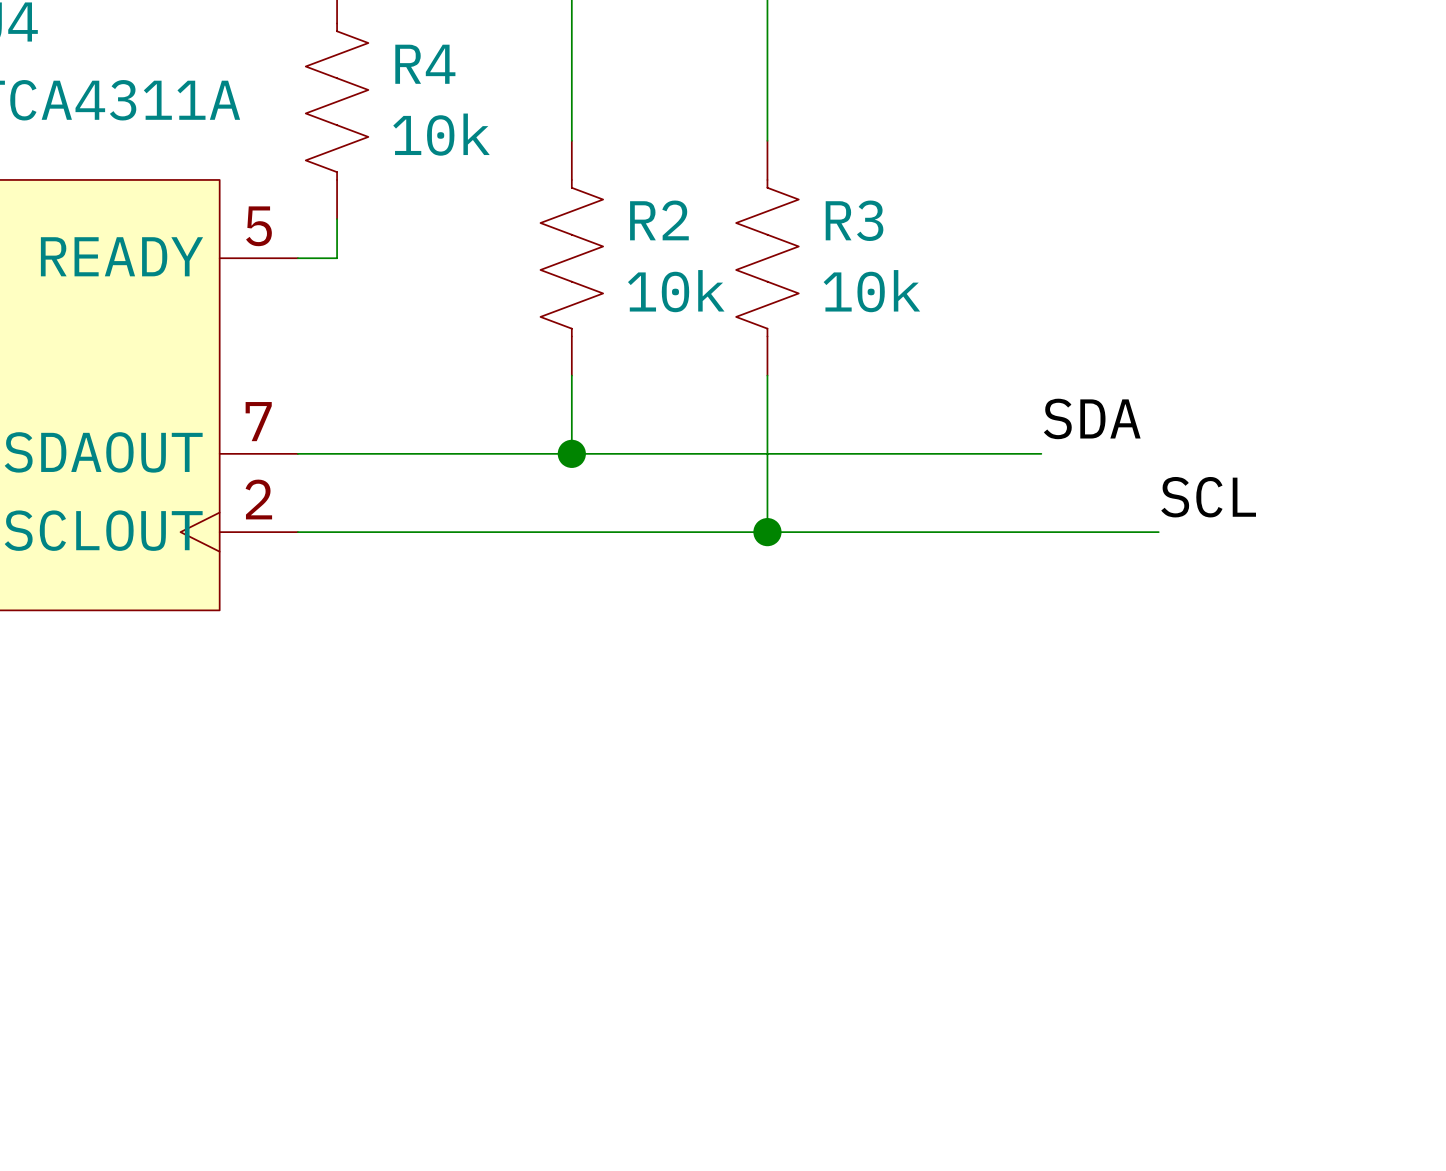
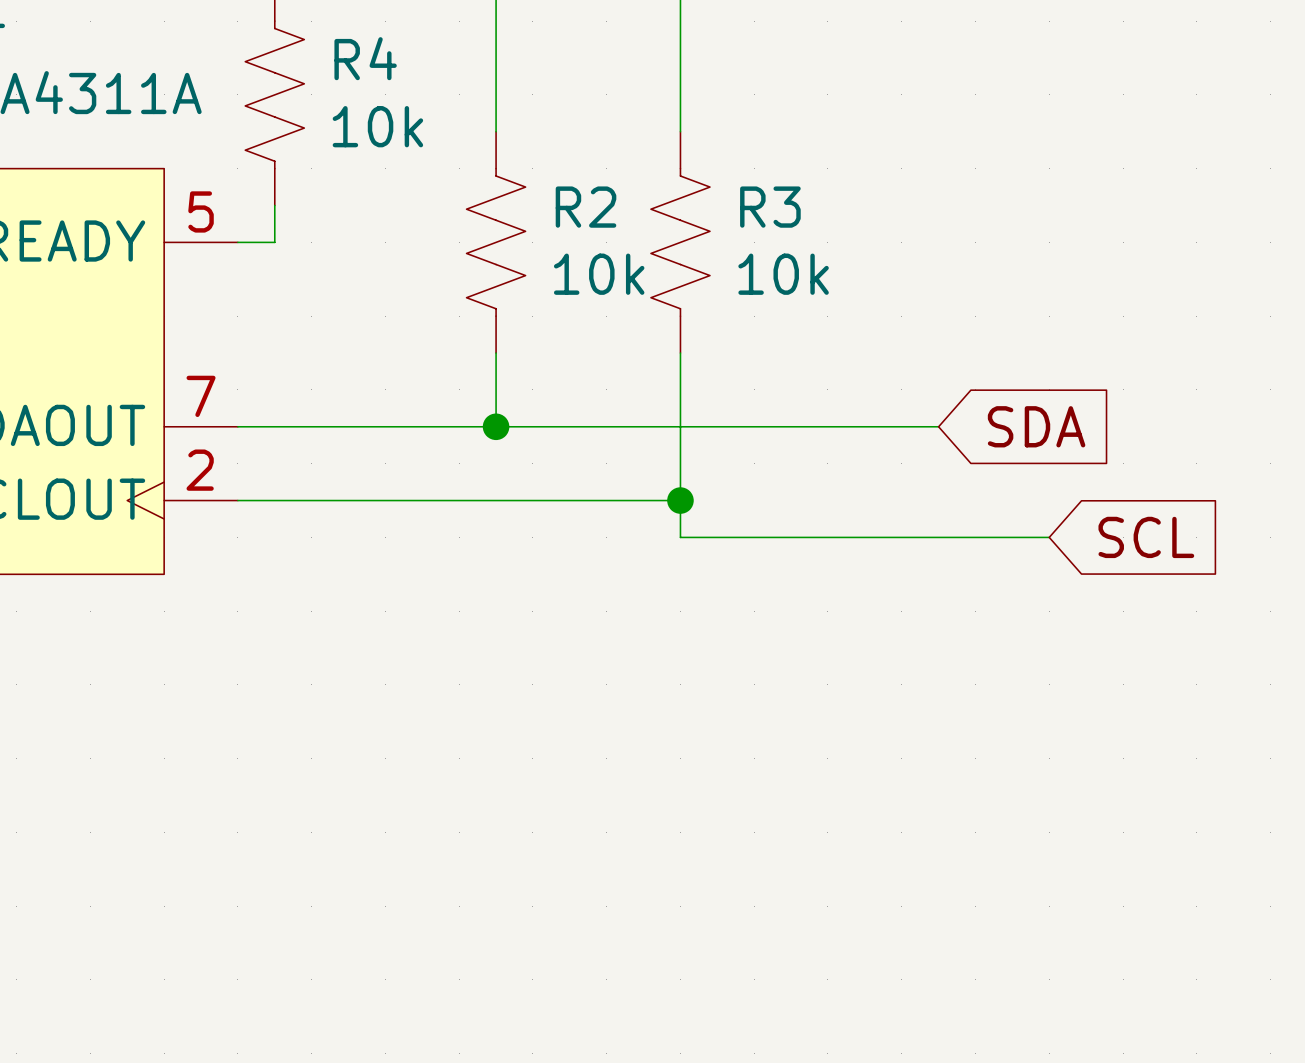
label: SDA (1092, 418) -> none
global label: none -> SDA (1036, 426)
label: SCL (1208, 497) -> none
wire: (767, 532) (1158, 532) -> (680, 500) (680, 537) (1049, 537)
global label: none -> SCL (1146, 537)

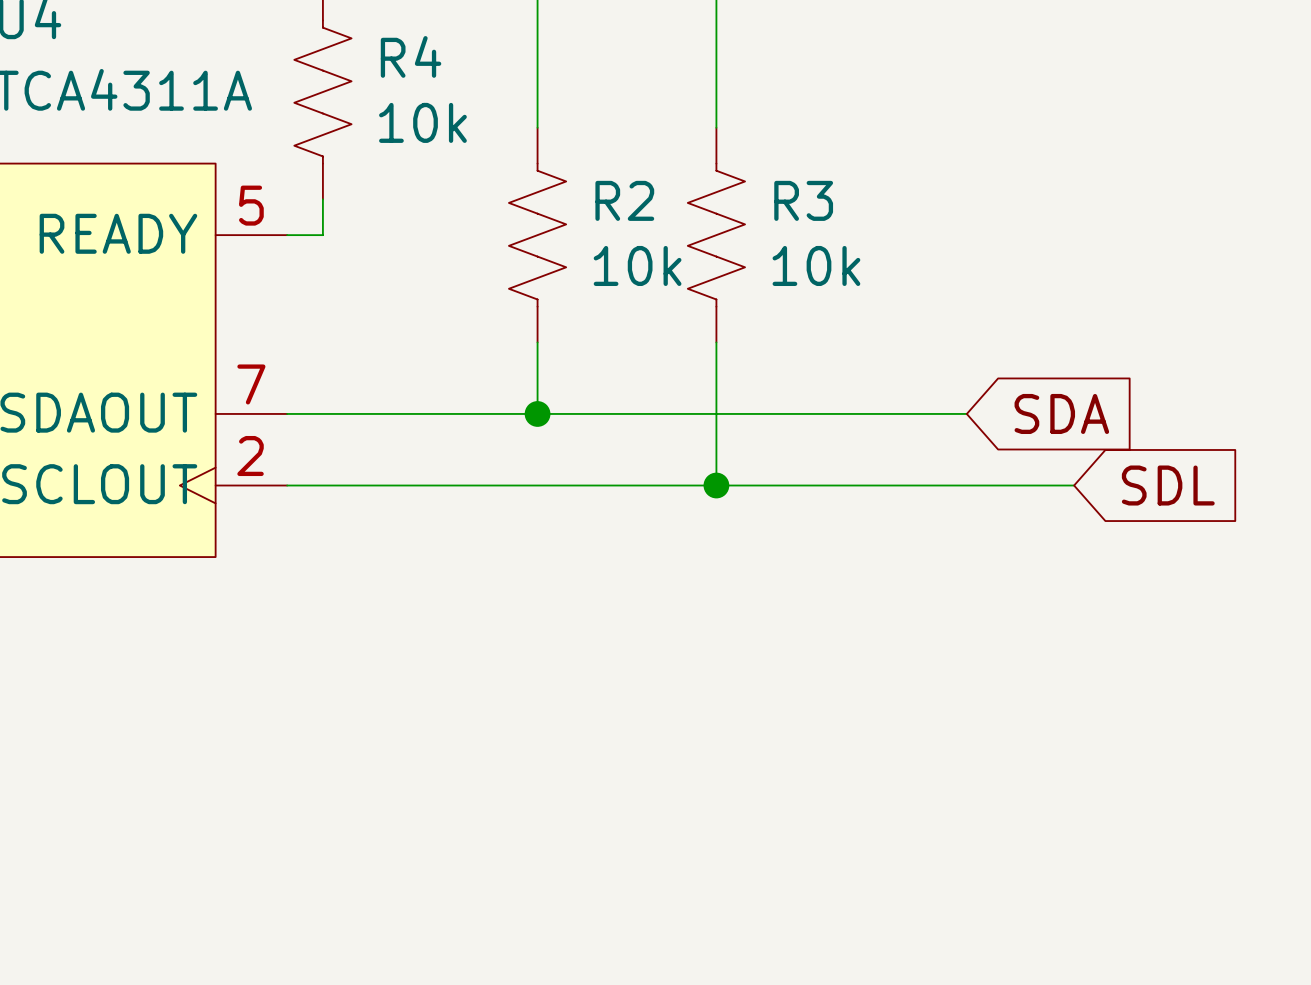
wire: (680, 500) (680, 537) (1049, 537) -> (716, 485) (1074, 485)
global label: SCL (1146, 537) -> SDL (1168, 485)

